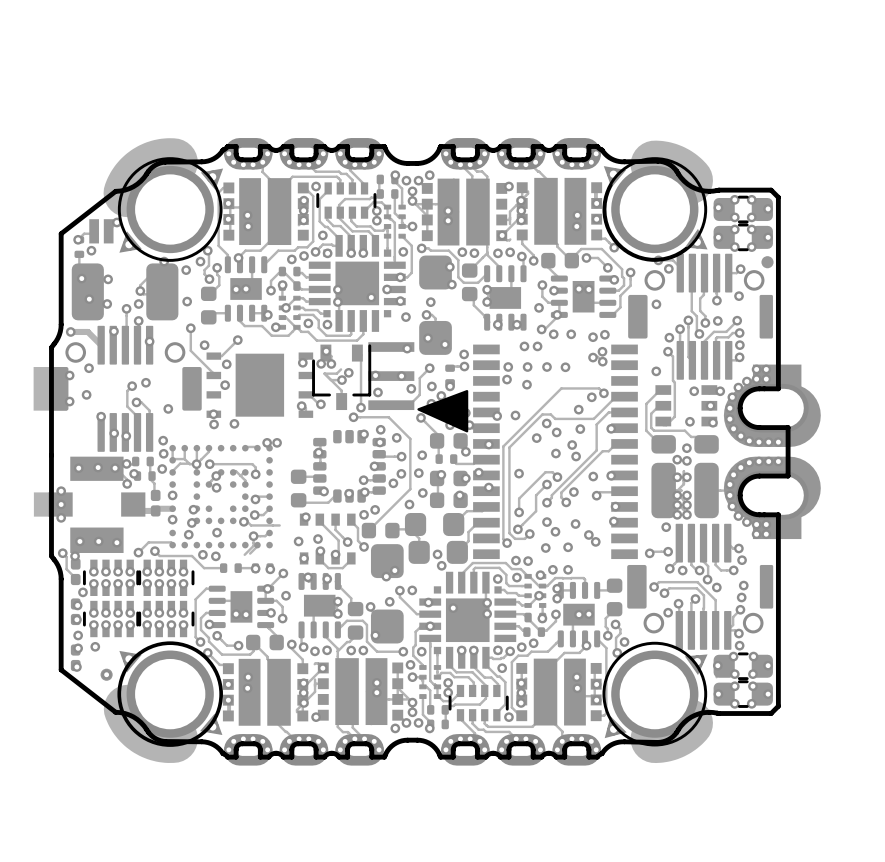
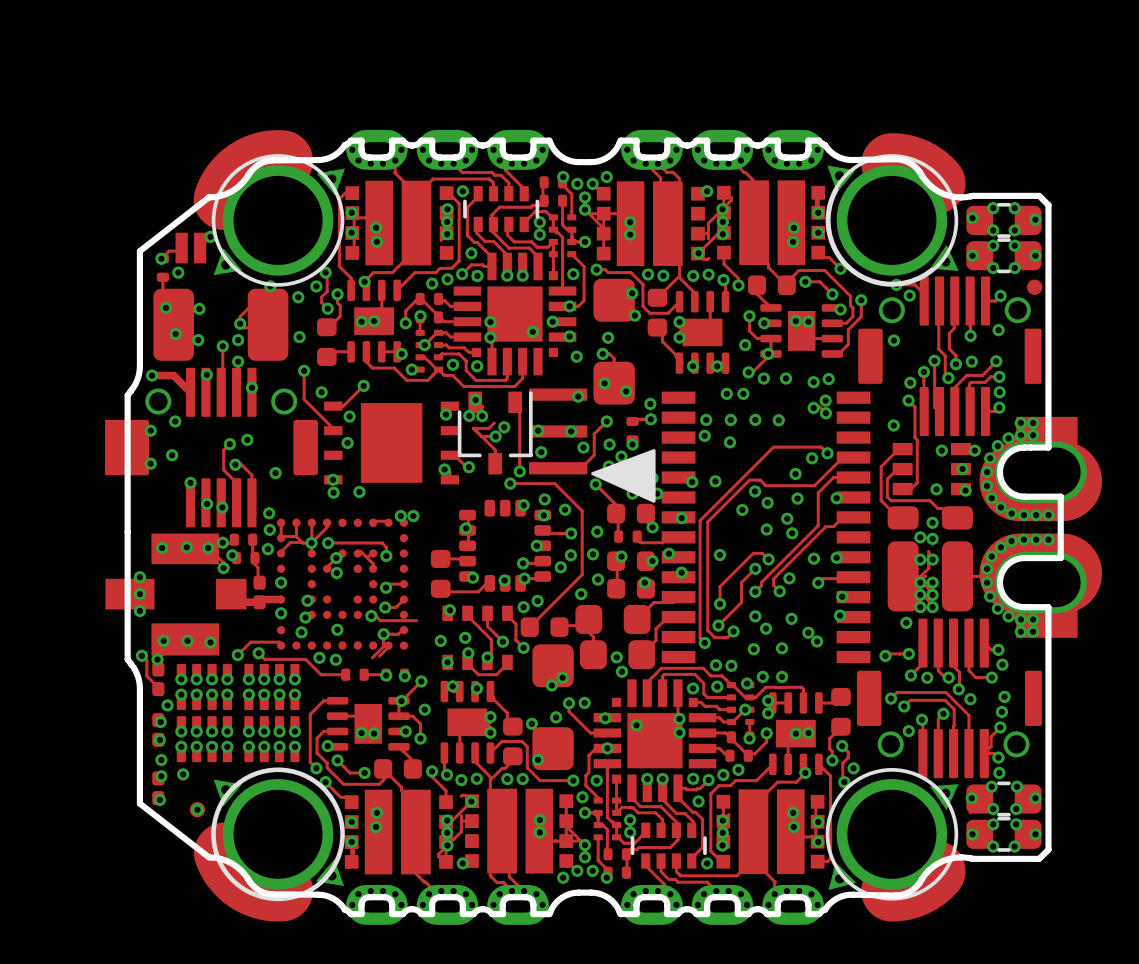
part footprint: [82, 559, 142, 596] -> [176, 663, 233, 711]
part footprint: [136, 559, 195, 596] -> [244, 663, 300, 711]
part footprint: [82, 600, 142, 638] -> [176, 716, 233, 763]
part footprint: [136, 600, 195, 638] -> [244, 716, 300, 763]

